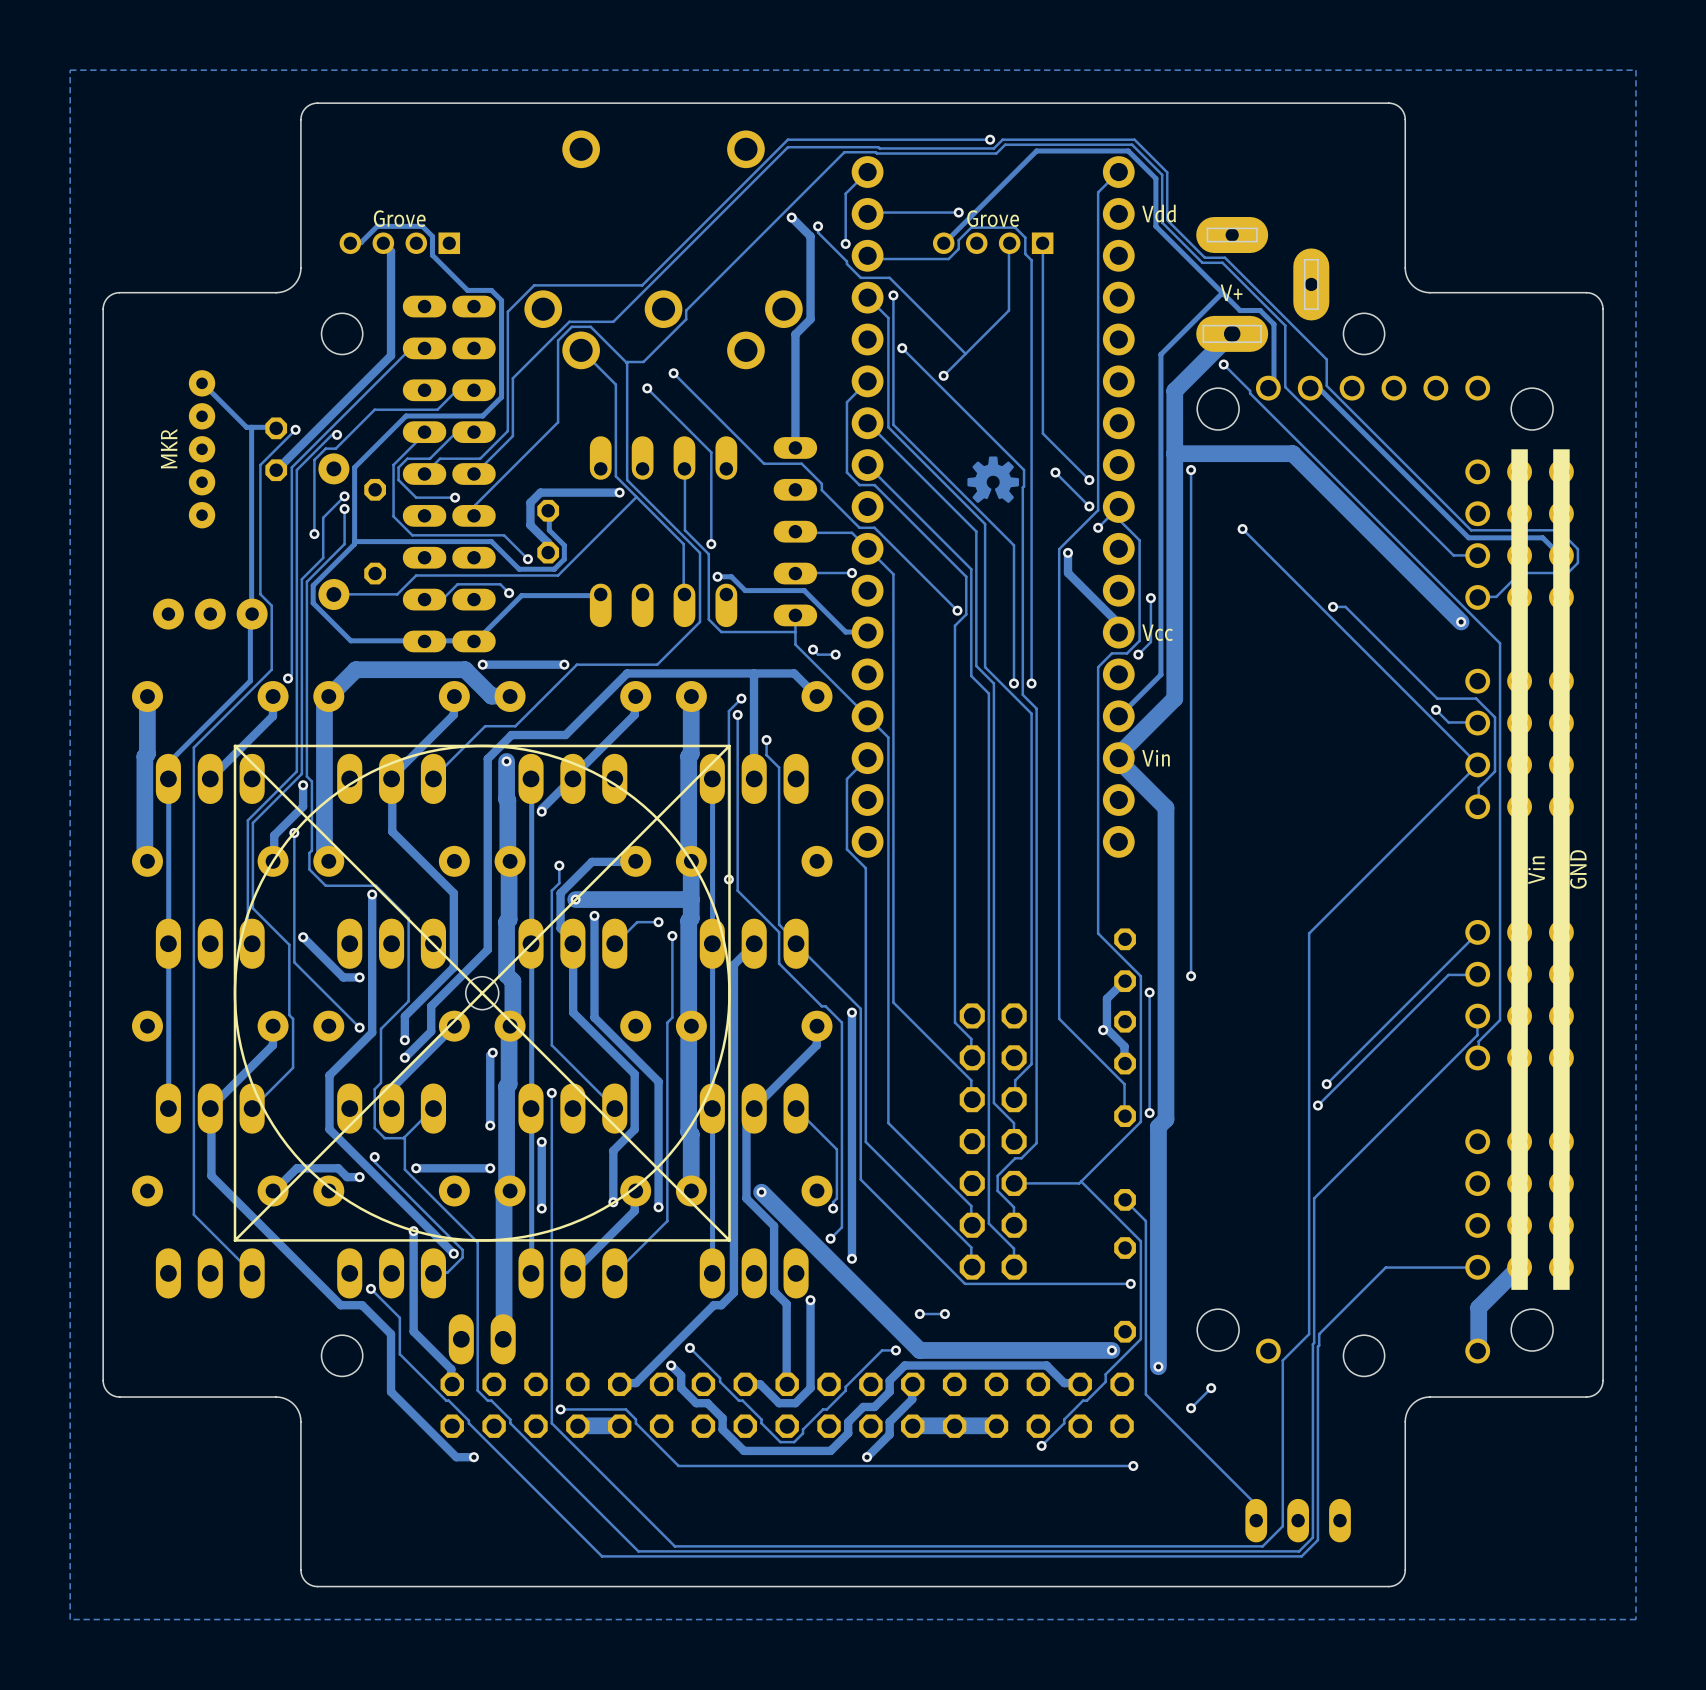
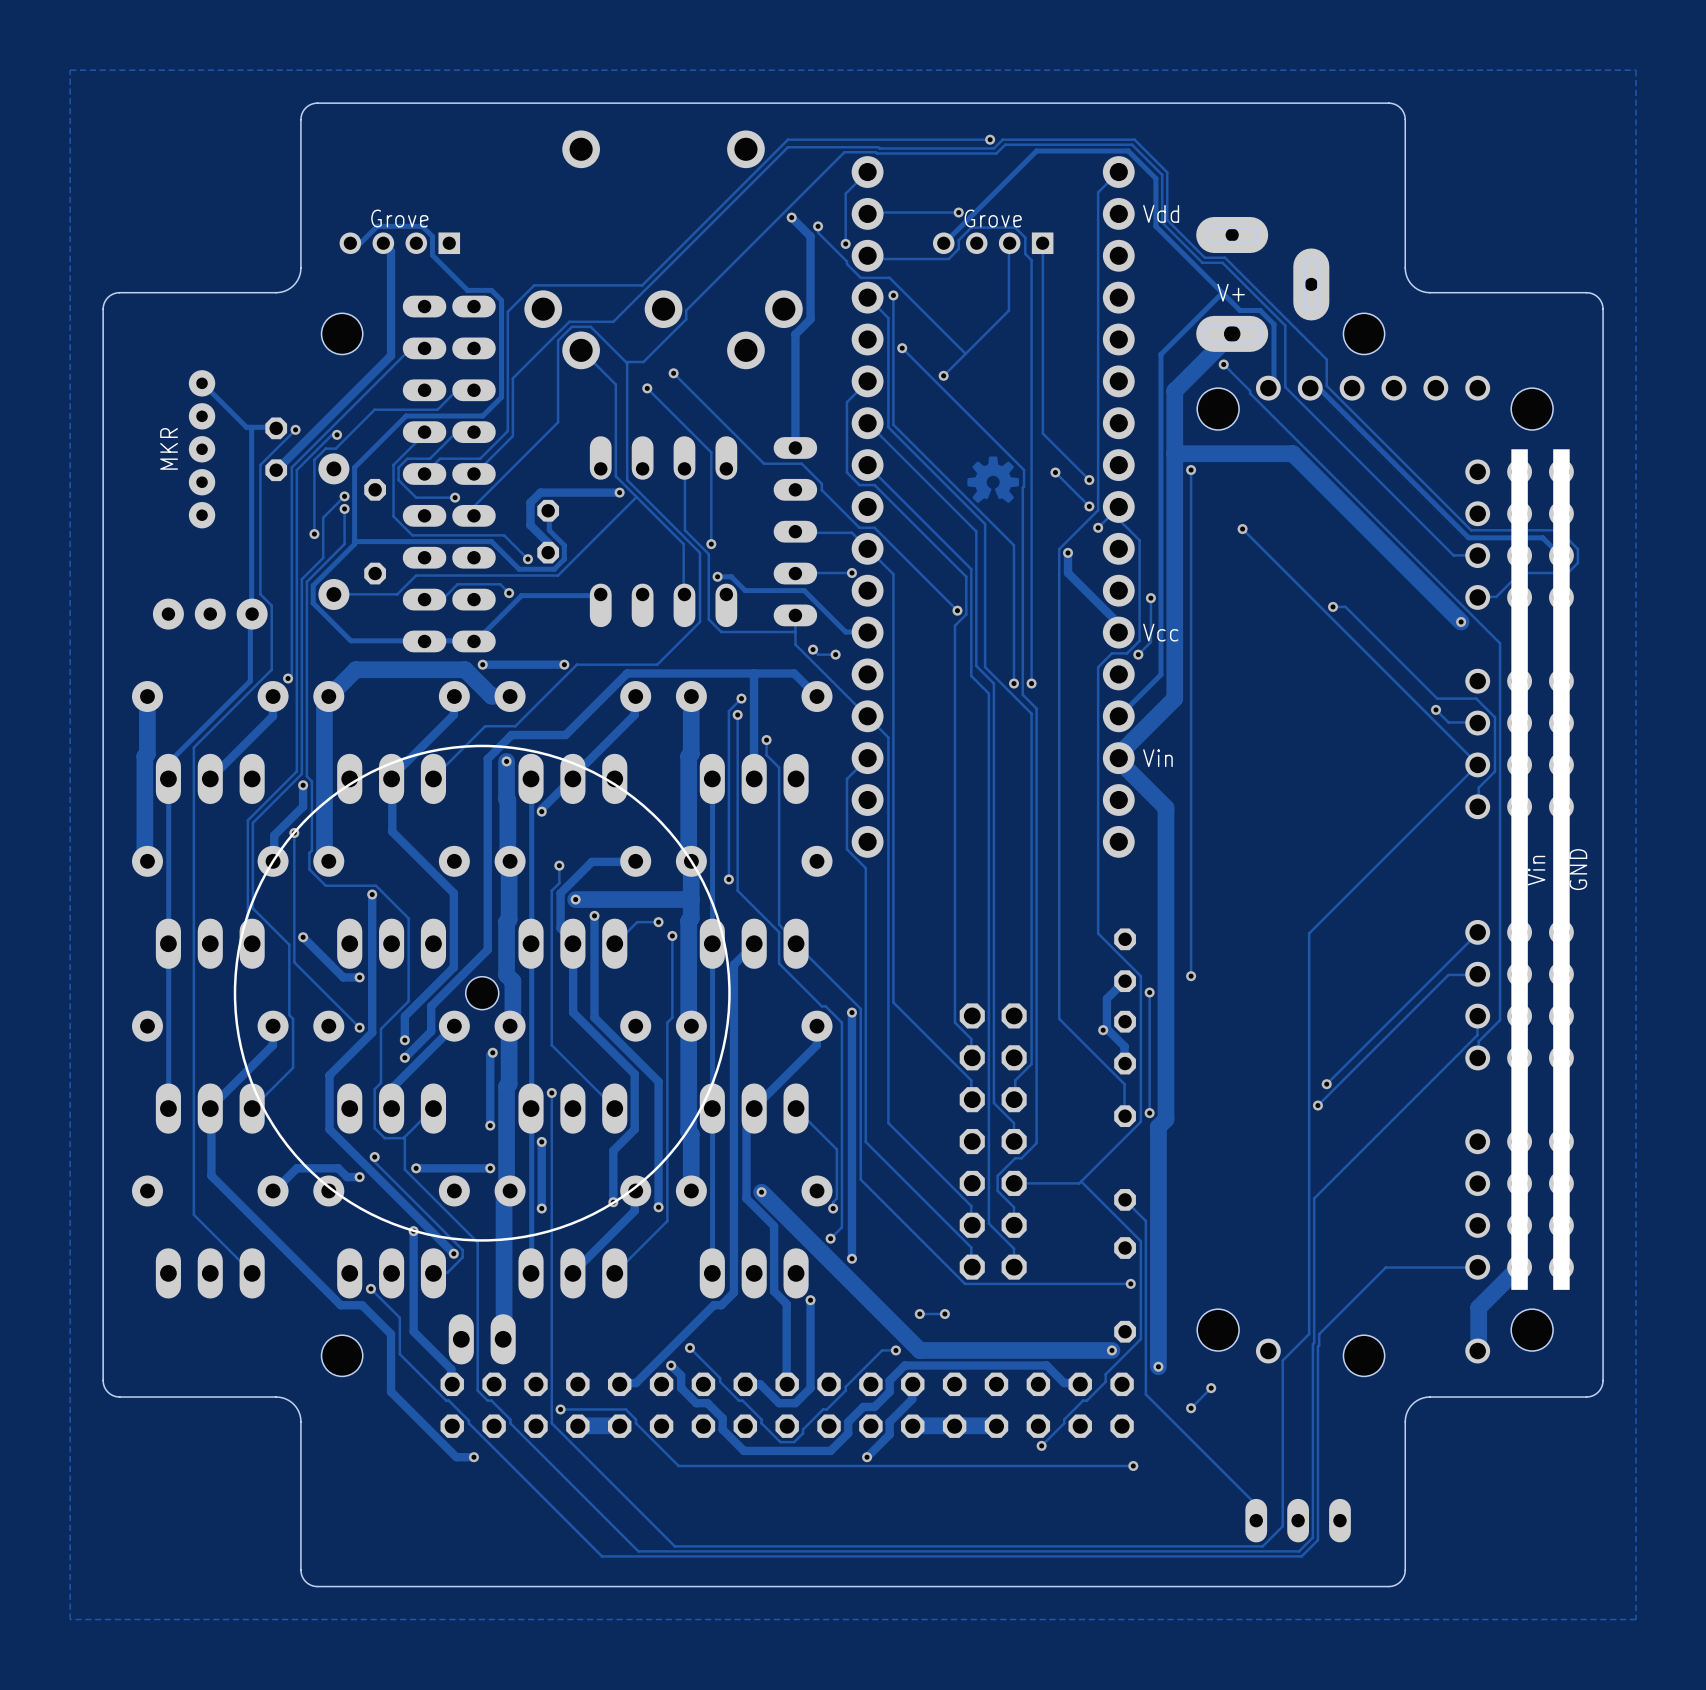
line: (235, 745) (235, 1240) -> none
line: (235, 745) (729, 1240) -> none
line: (729, 745) (235, 745) -> none
line: (729, 745) (729, 1240) -> none
line: (729, 745) (235, 1240) -> none
line: (729, 1240) (235, 1240) -> none

